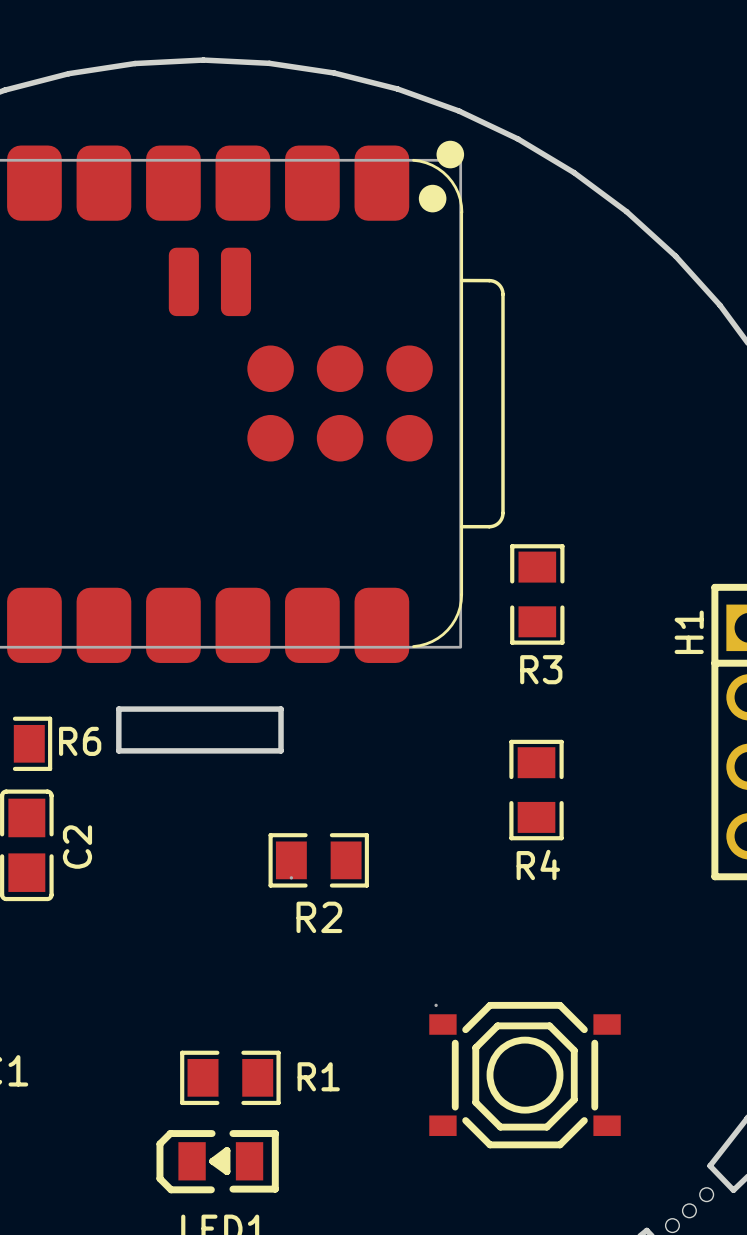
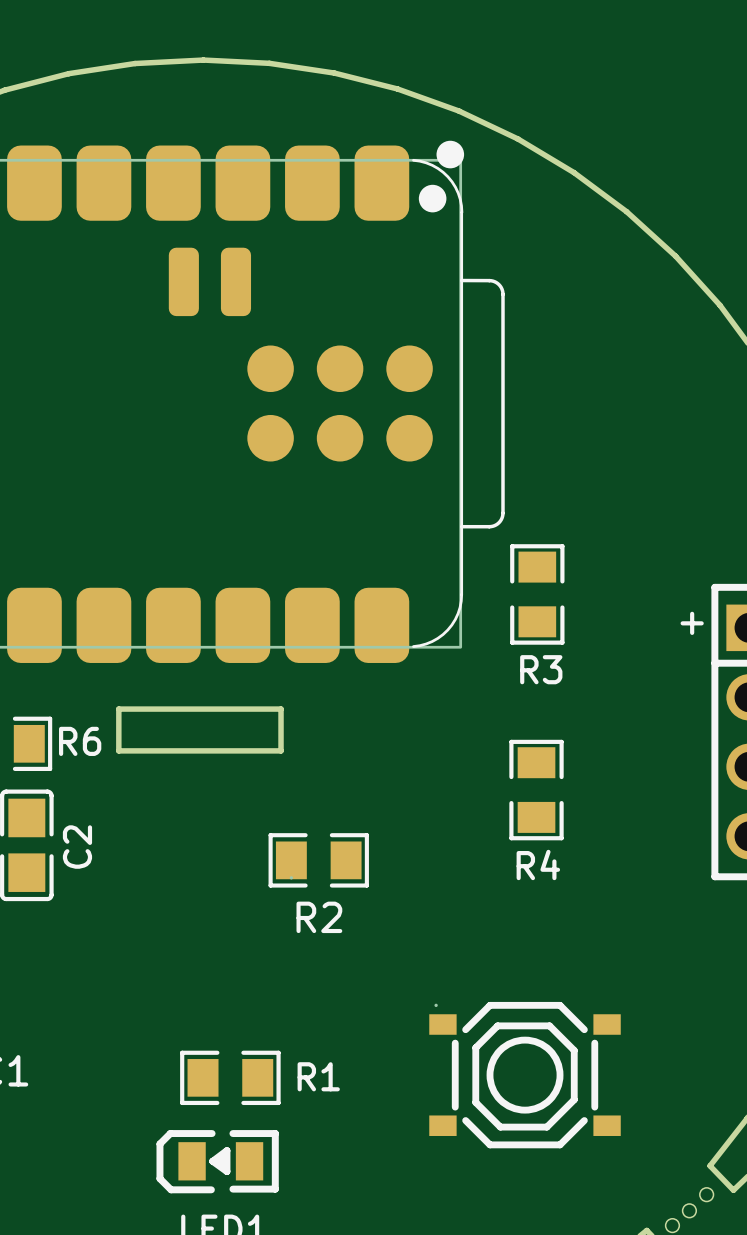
H1 name: H1 (689, 632) -> + (692, 623)

